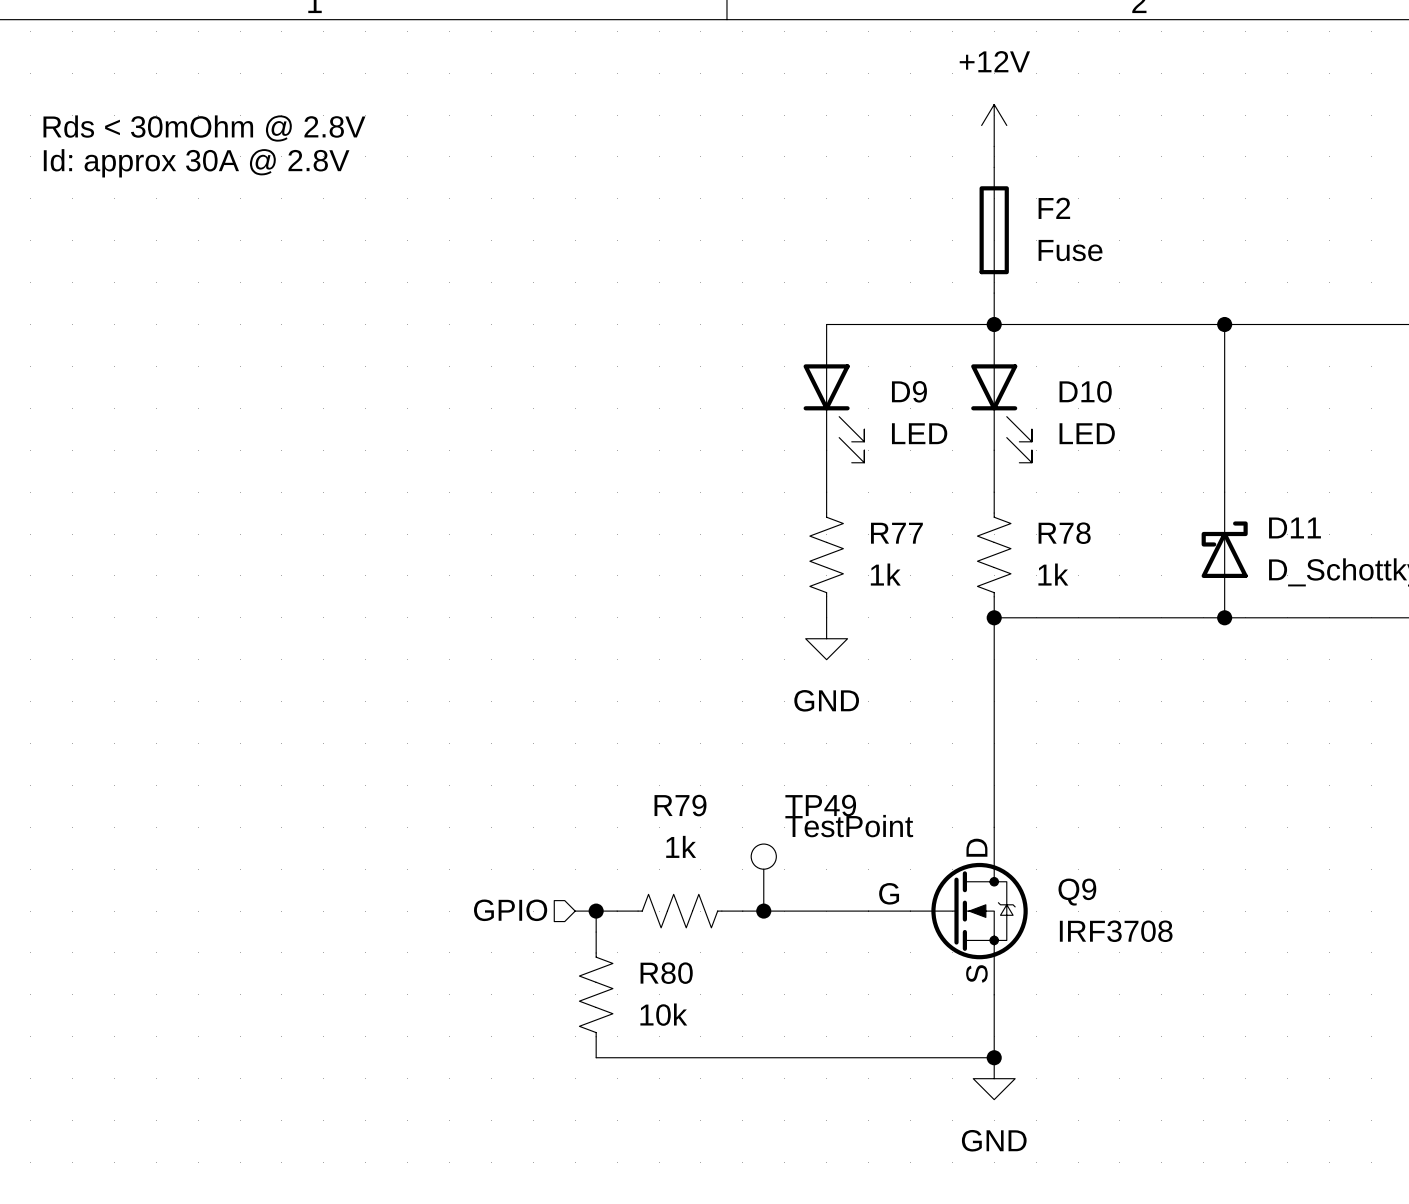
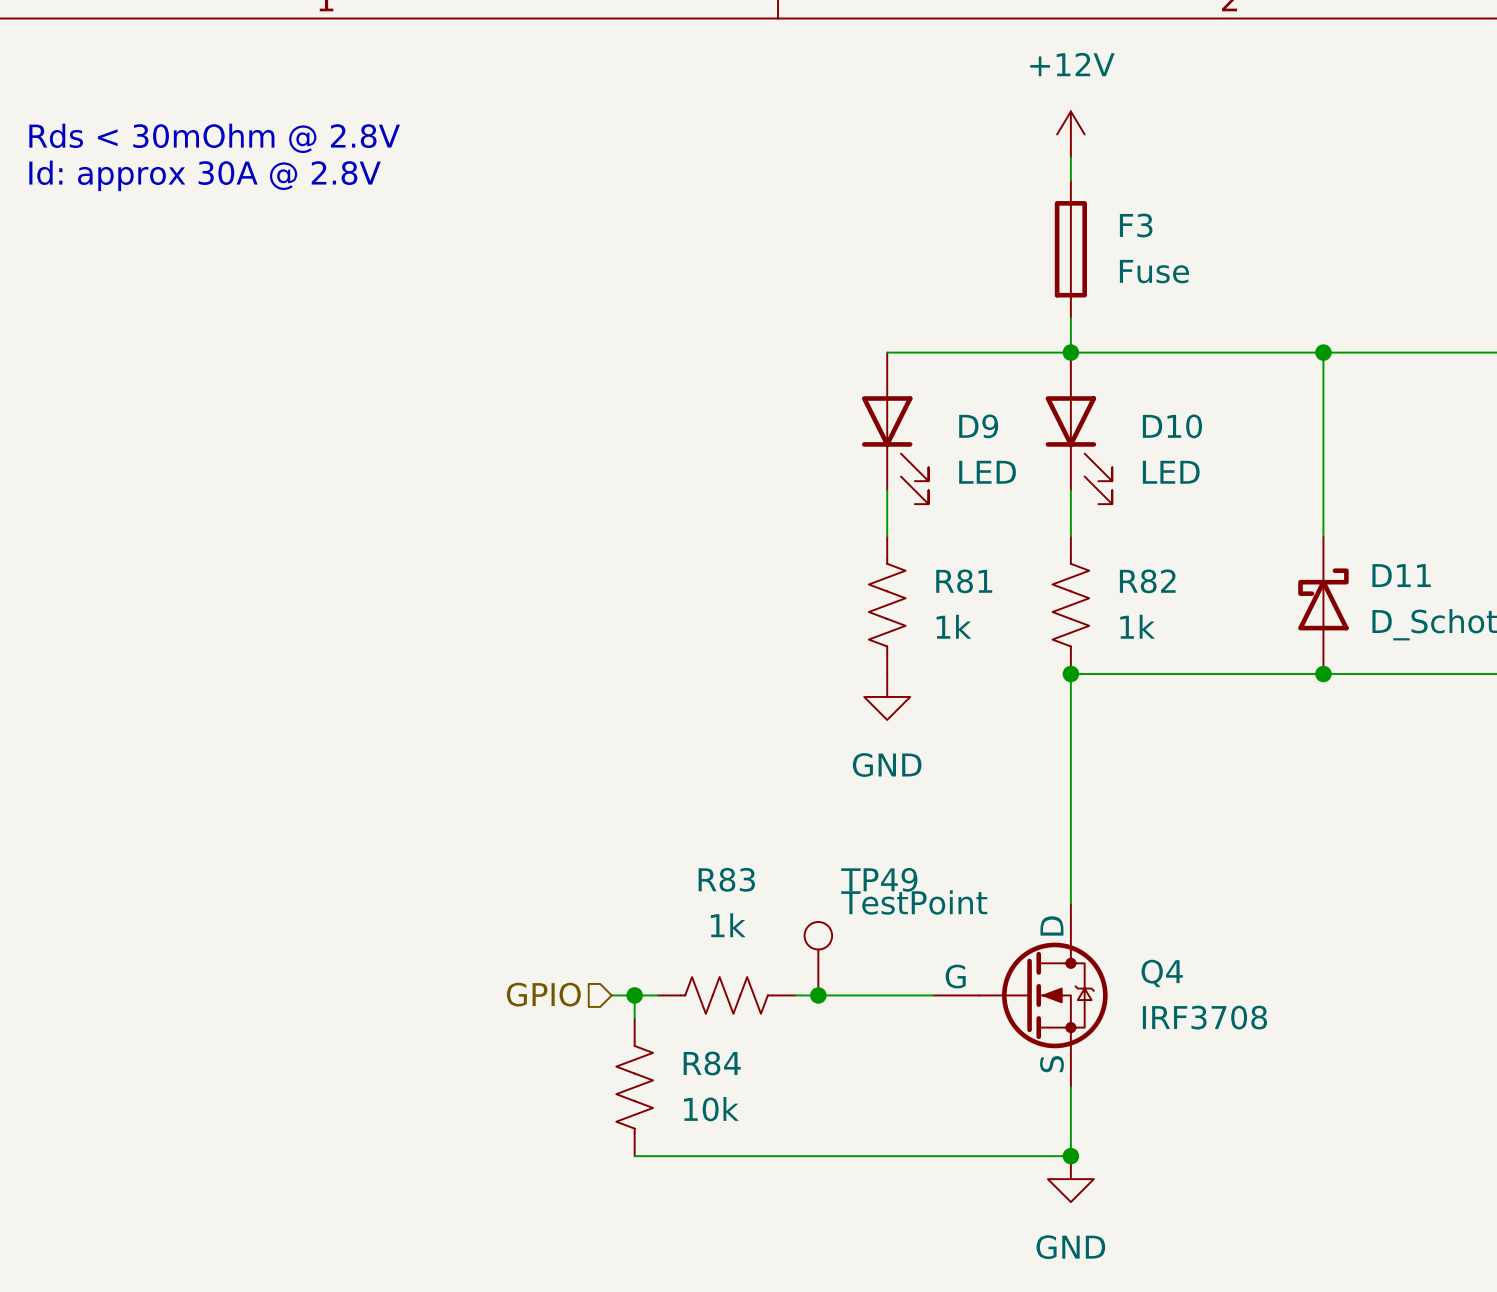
F2 name: F2 (1054, 208) -> F3 (1136, 225)
R77 name: R77 (896, 533) -> R81 (964, 581)
R78 name: R78 (1064, 533) -> R82 (1147, 581)
R79 name: R79 (680, 805) -> R83 (726, 879)
Q9 name: Q9 (1077, 892) -> Q4 (1162, 973)
R80 name: R80 (666, 973) -> R84 (712, 1063)

